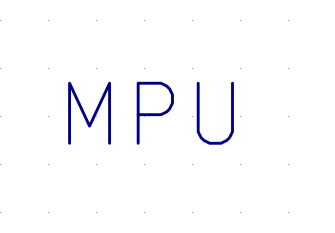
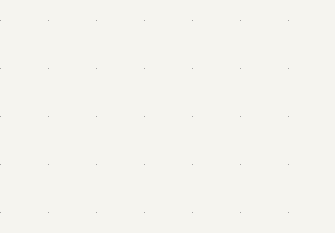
text: MPU (151, 113) -> none

